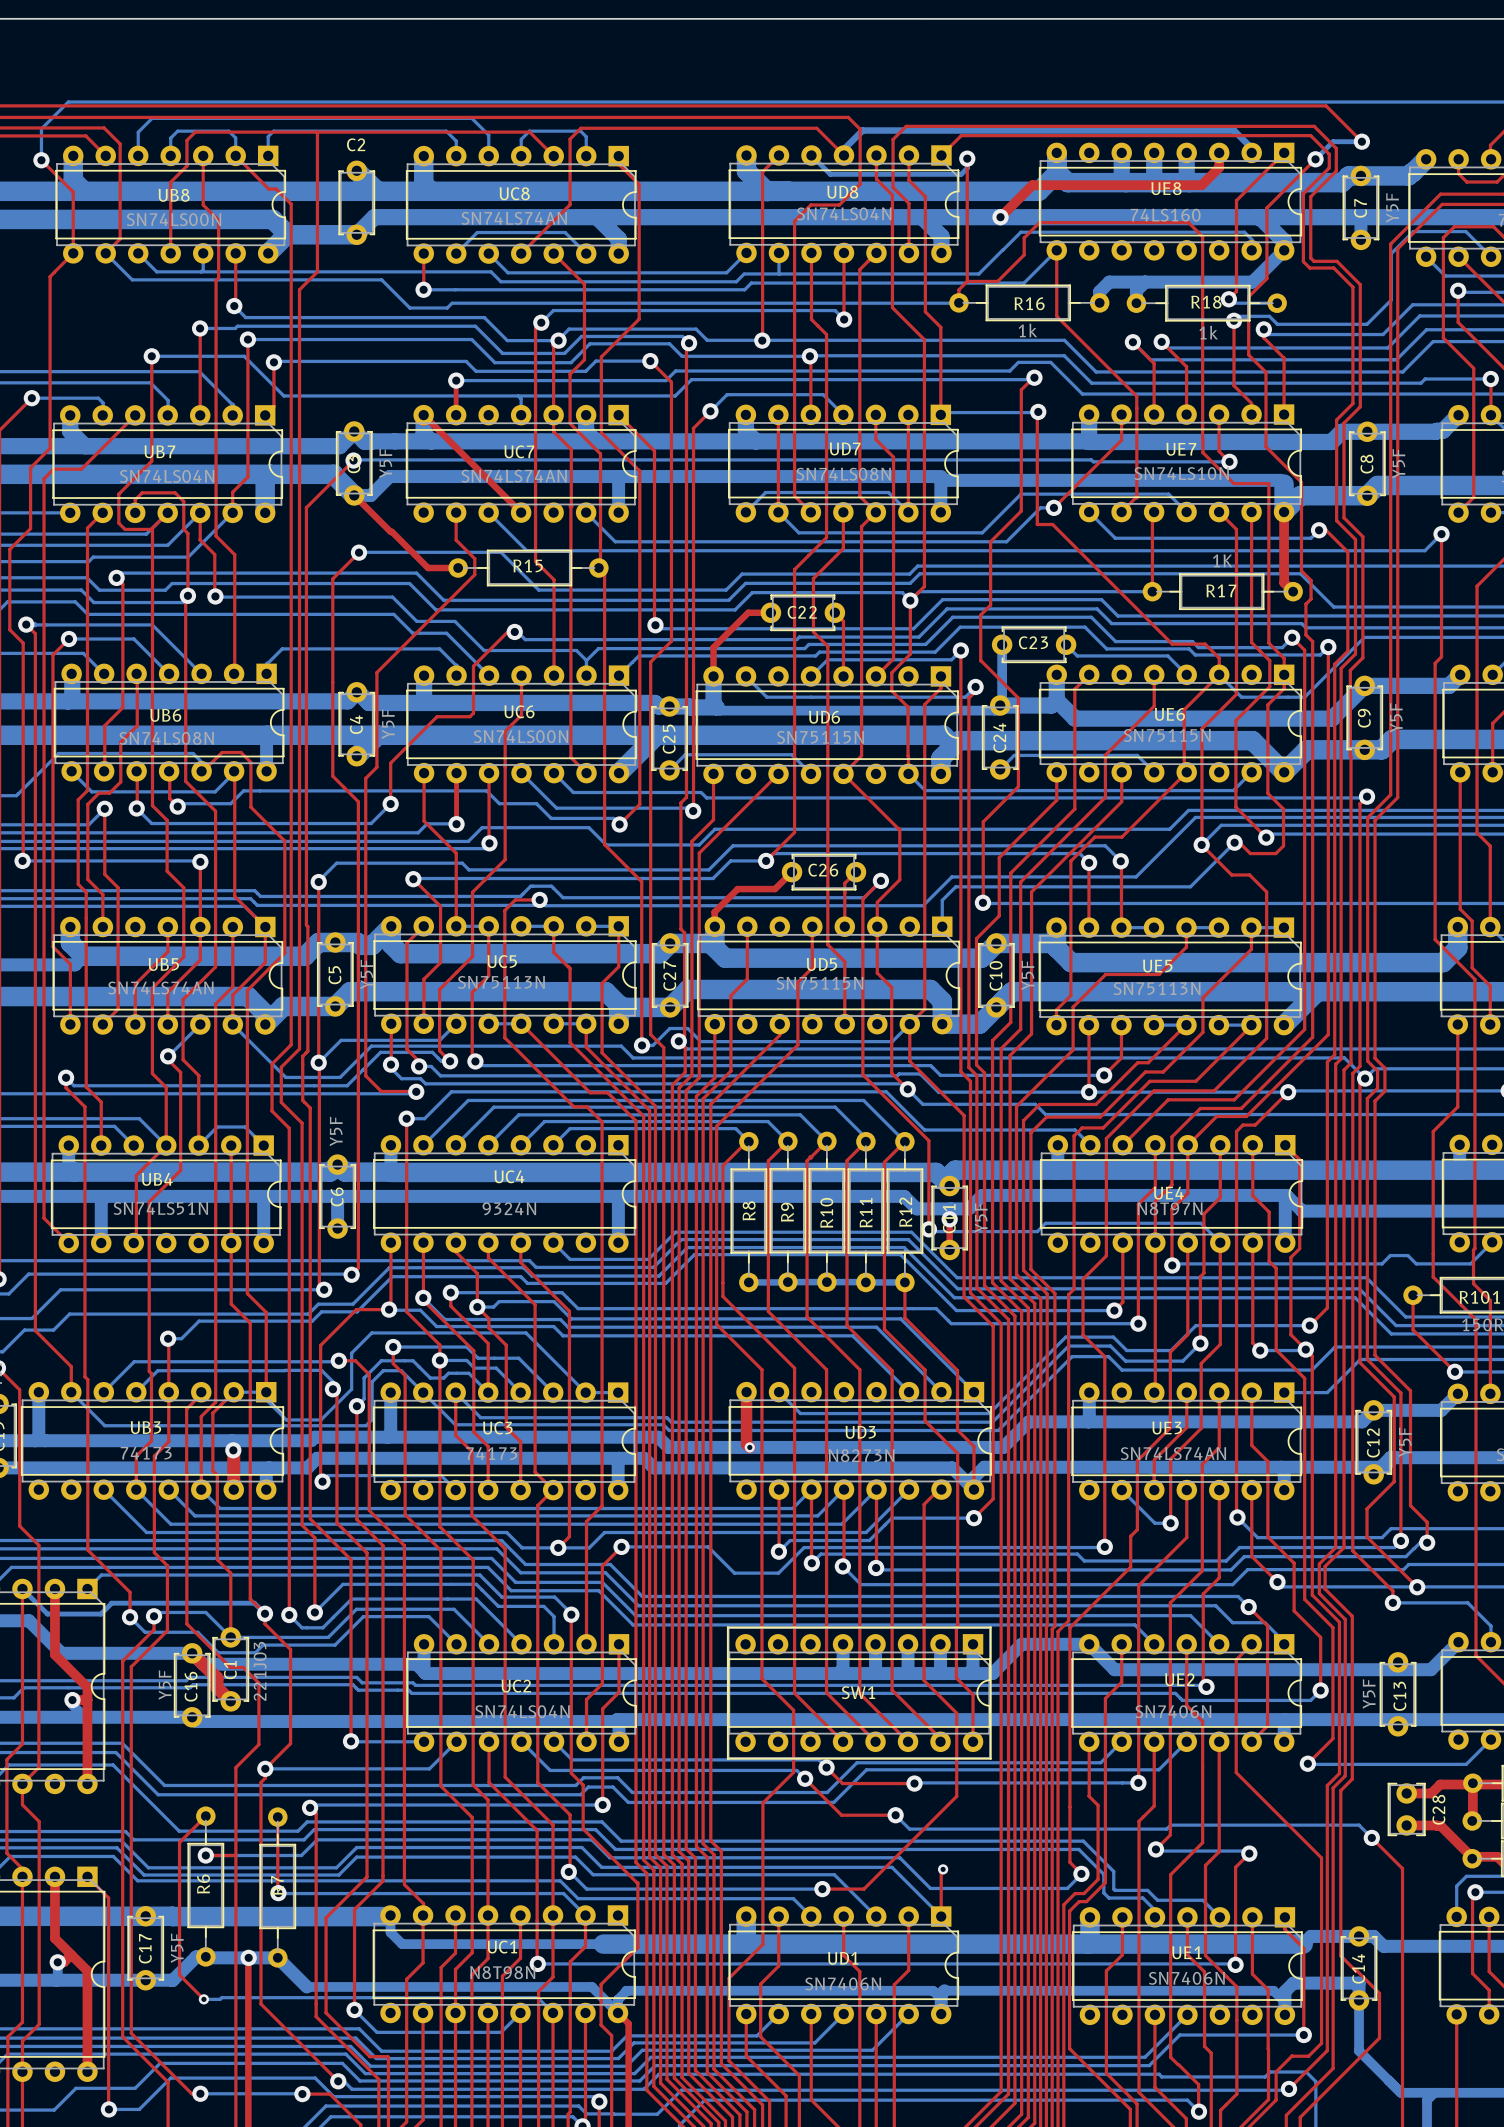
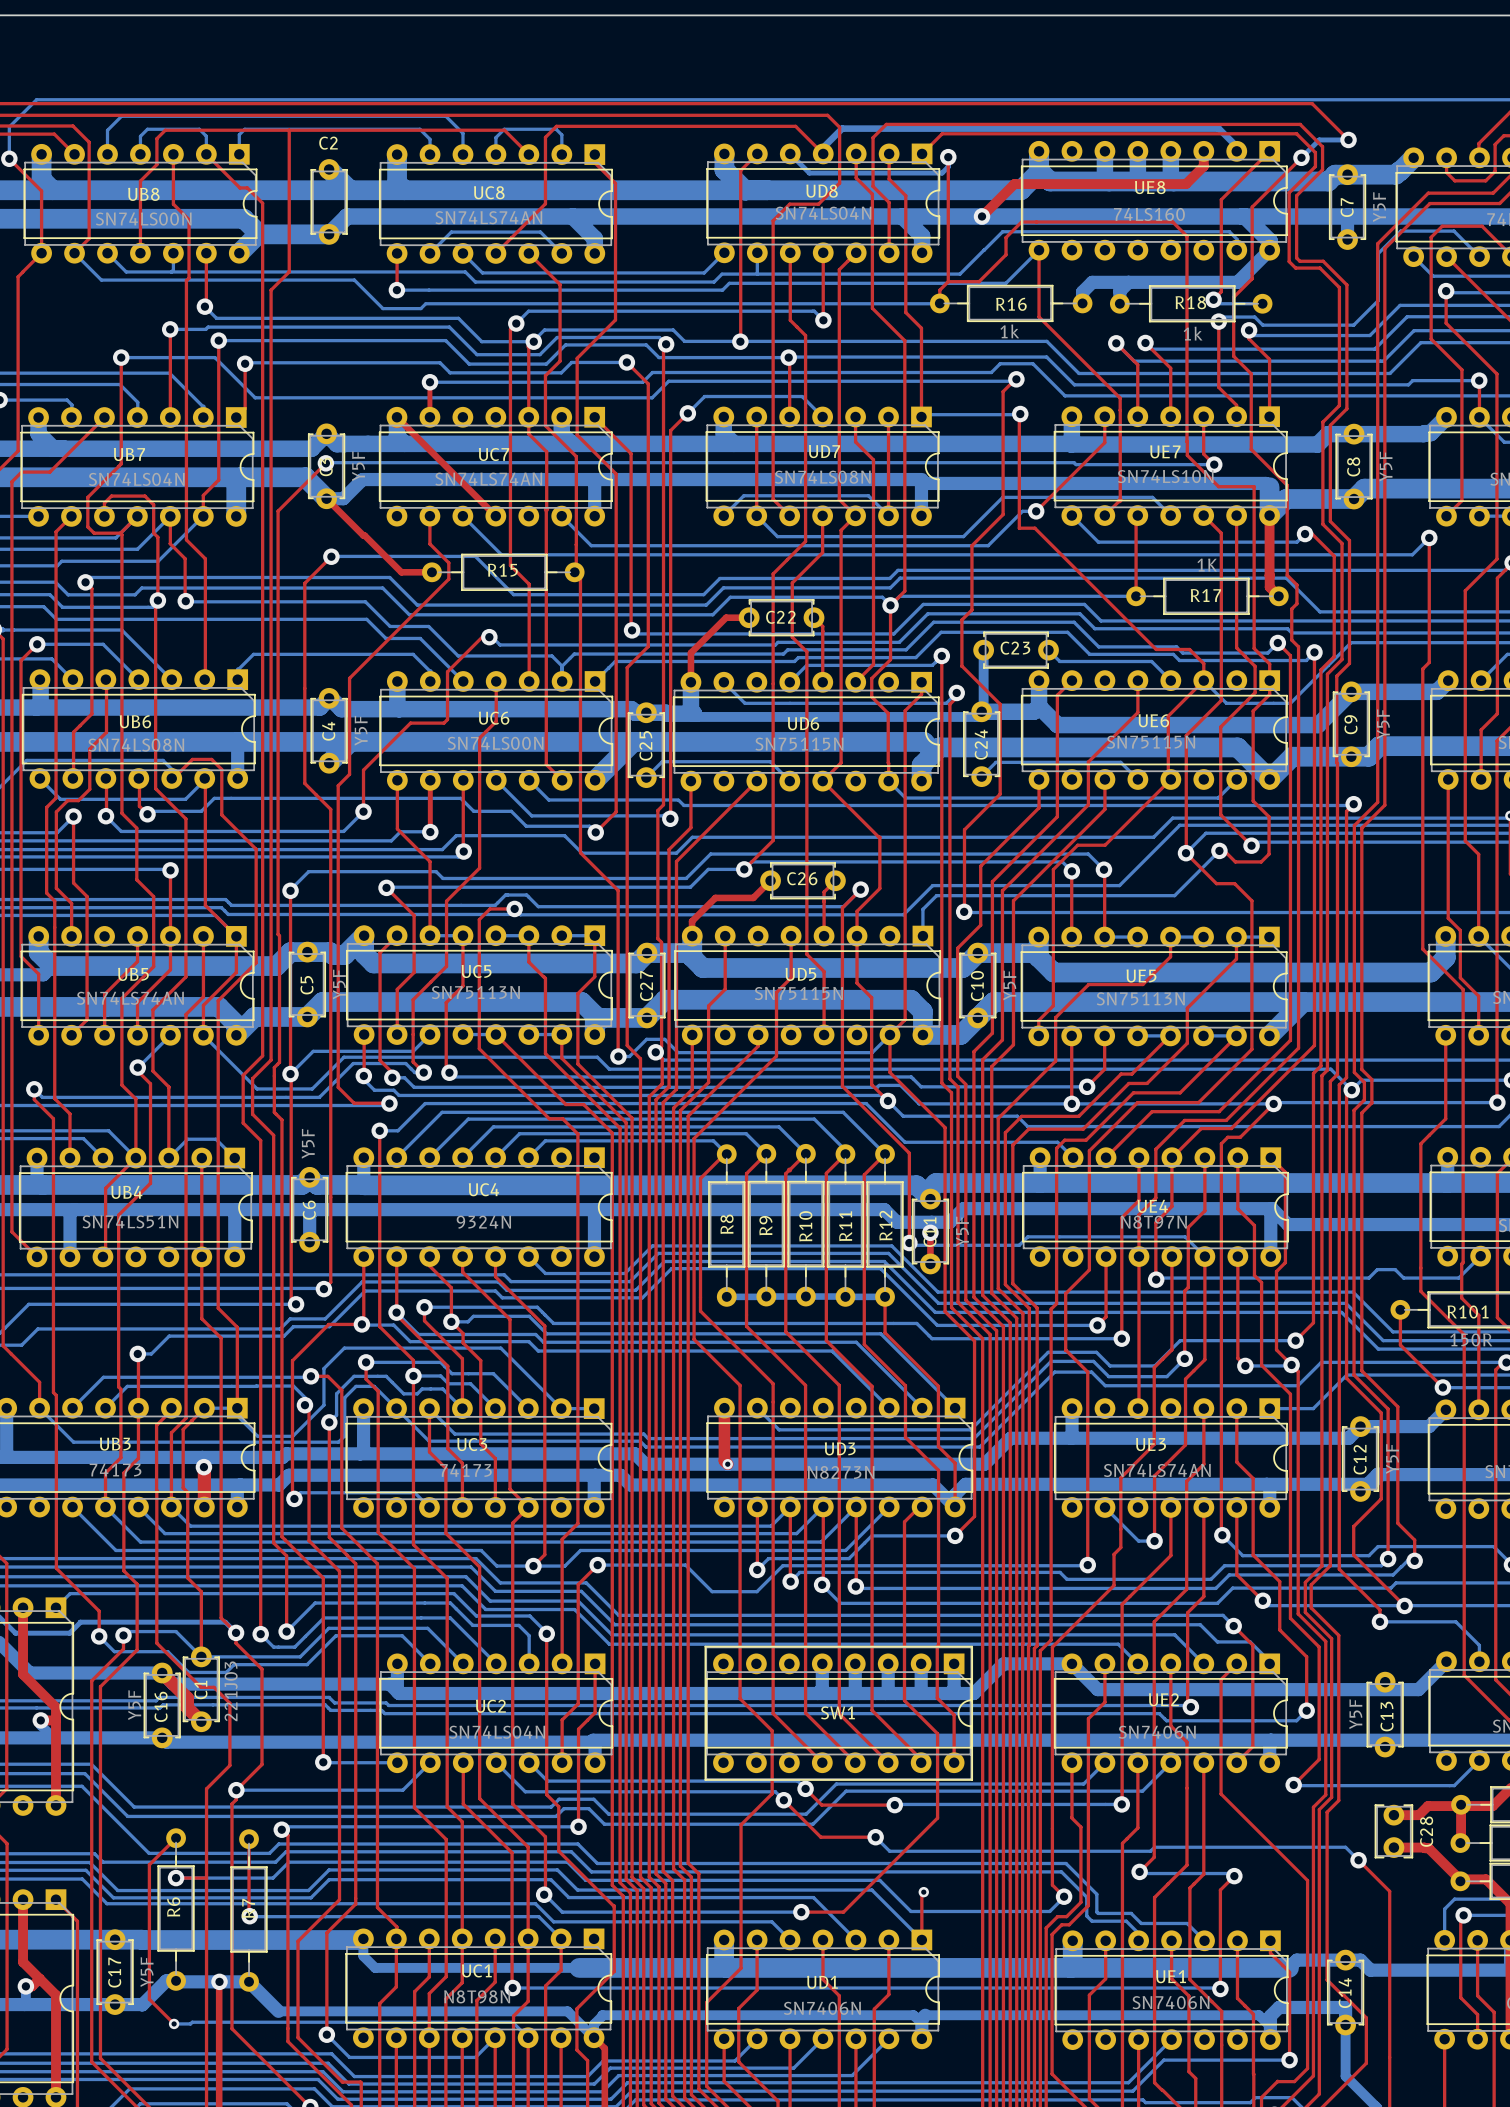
bottom track: (518, 395) (521, 398) (521, 415) -> none
top track: (1186, 1392) (1186, 1427) (1154, 1460) (1154, 1490) -> none

